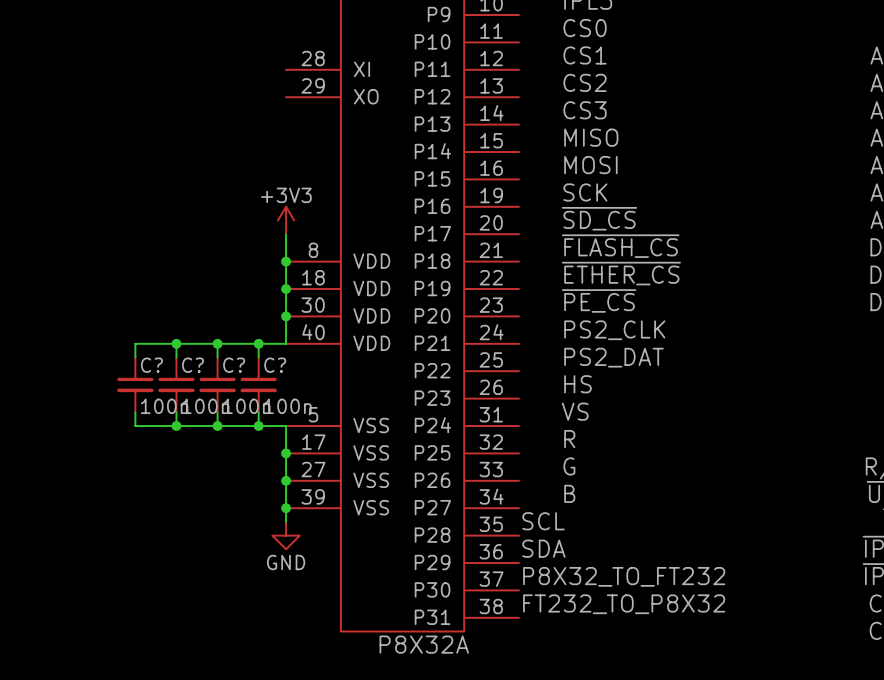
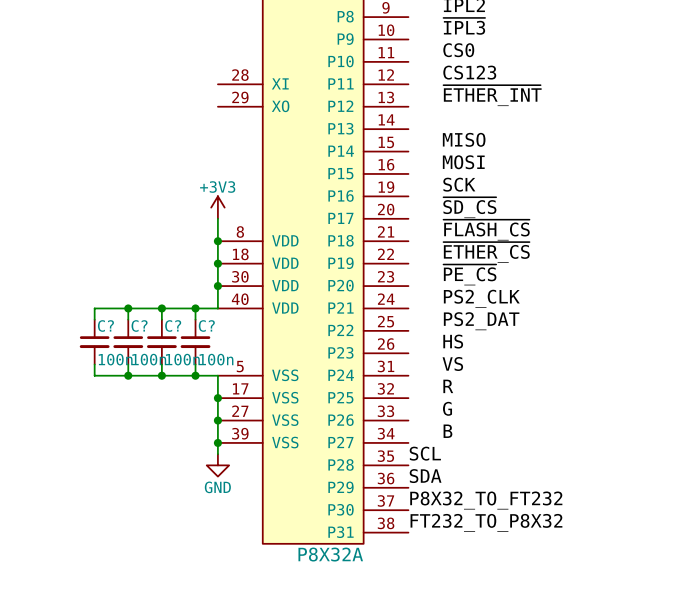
label: CS1 (585, 55) -> CS123 (469, 72)
label: CS2 (585, 82) -> ~{ETHER_INT} (492, 95)
label: CS3 (585, 110) -> none

